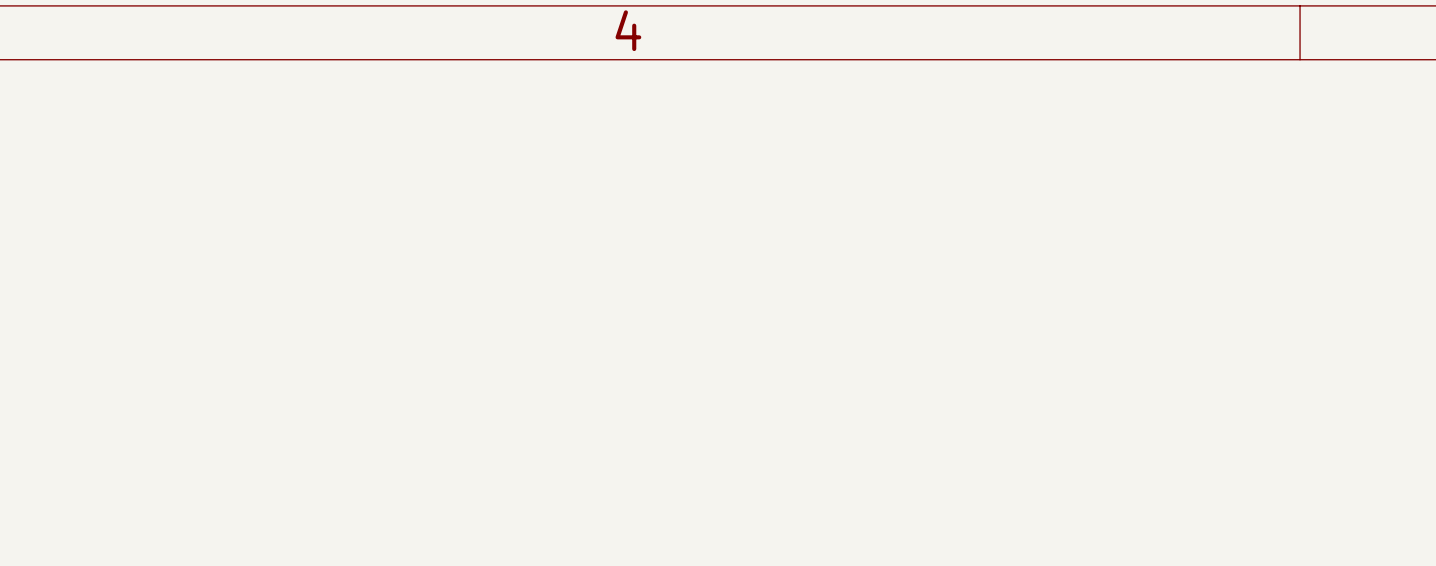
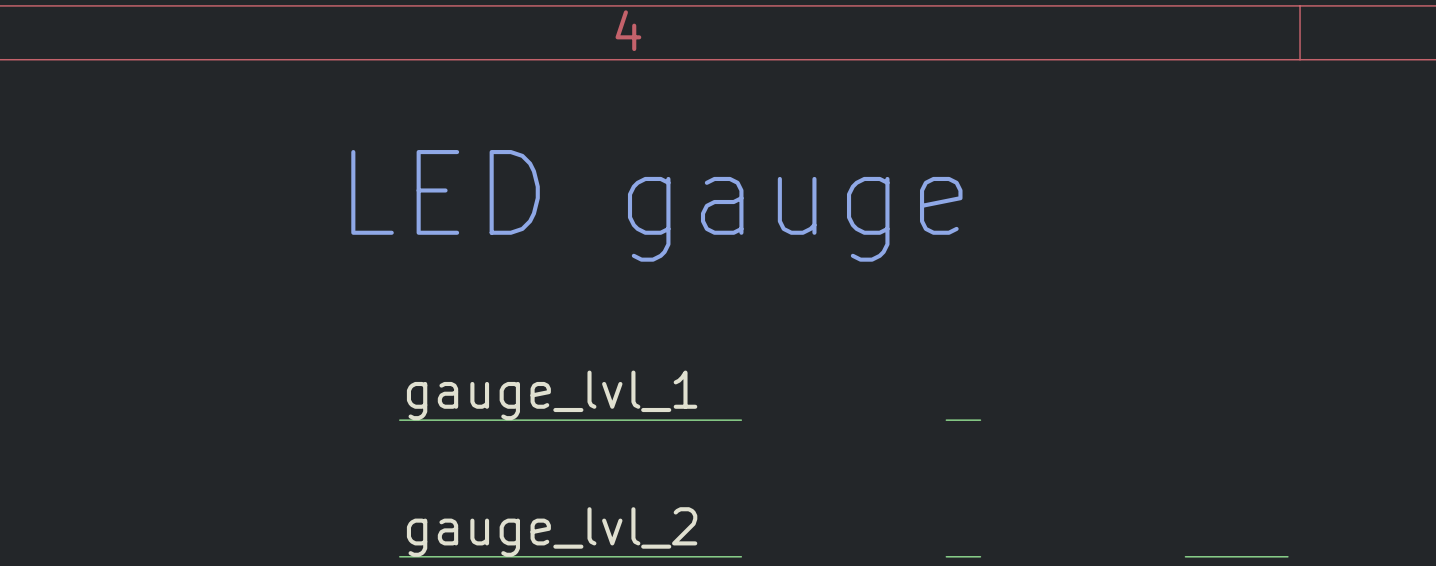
text: none -> LED gauge (656, 205)
label: none -> gauge_lvl_1 (552, 395)
wire: none -> (399, 420) (741, 420)
wire: none -> (946, 420) (980, 420)
label: none -> gauge_lvl_2 (552, 532)
wire: none -> (399, 556) (741, 556)
wire: none -> (946, 556) (980, 556)
wire: none -> (1185, 556) (1287, 556)

